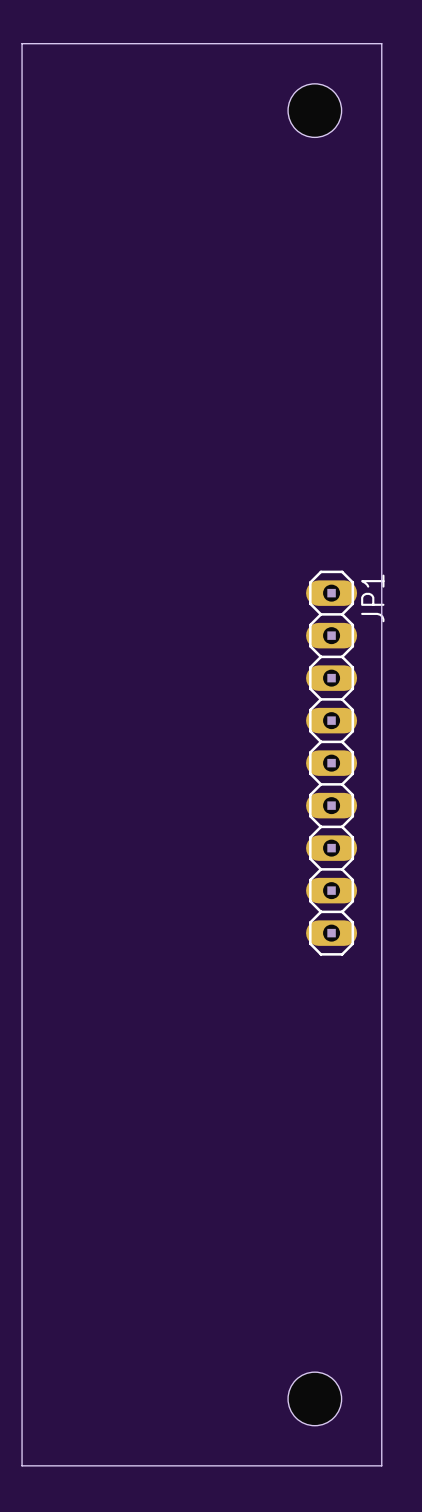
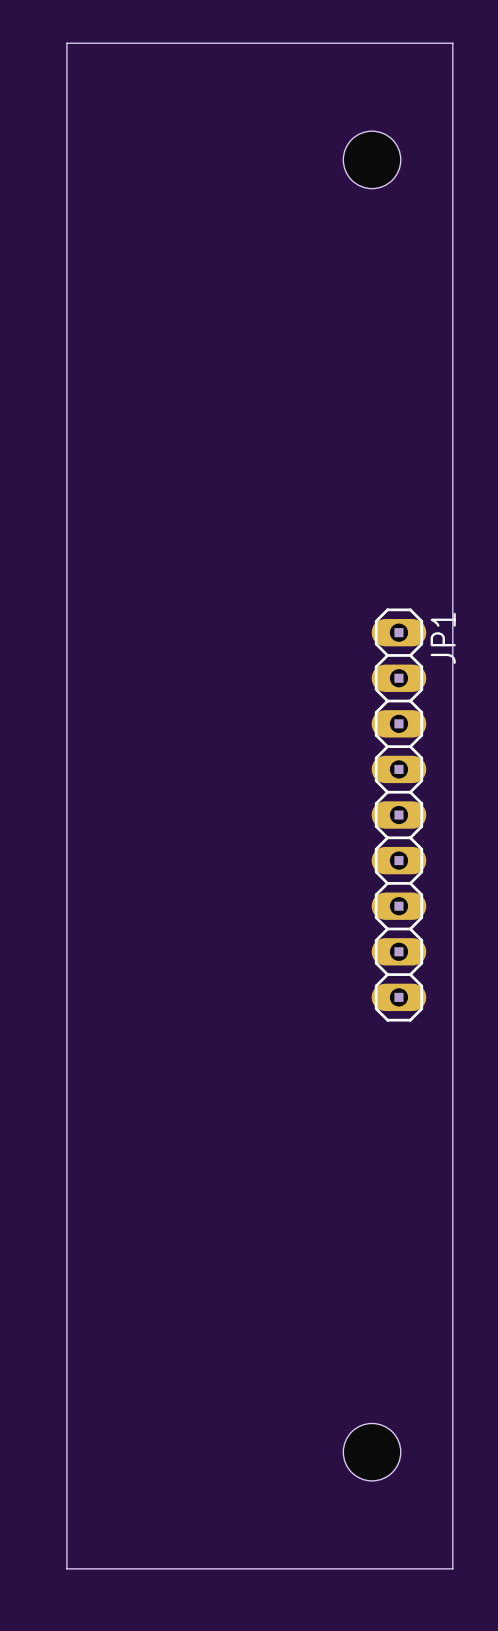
hole position: (314, 110) -> (372, 159)
hole position: (314, 1398) -> (372, 1452)

